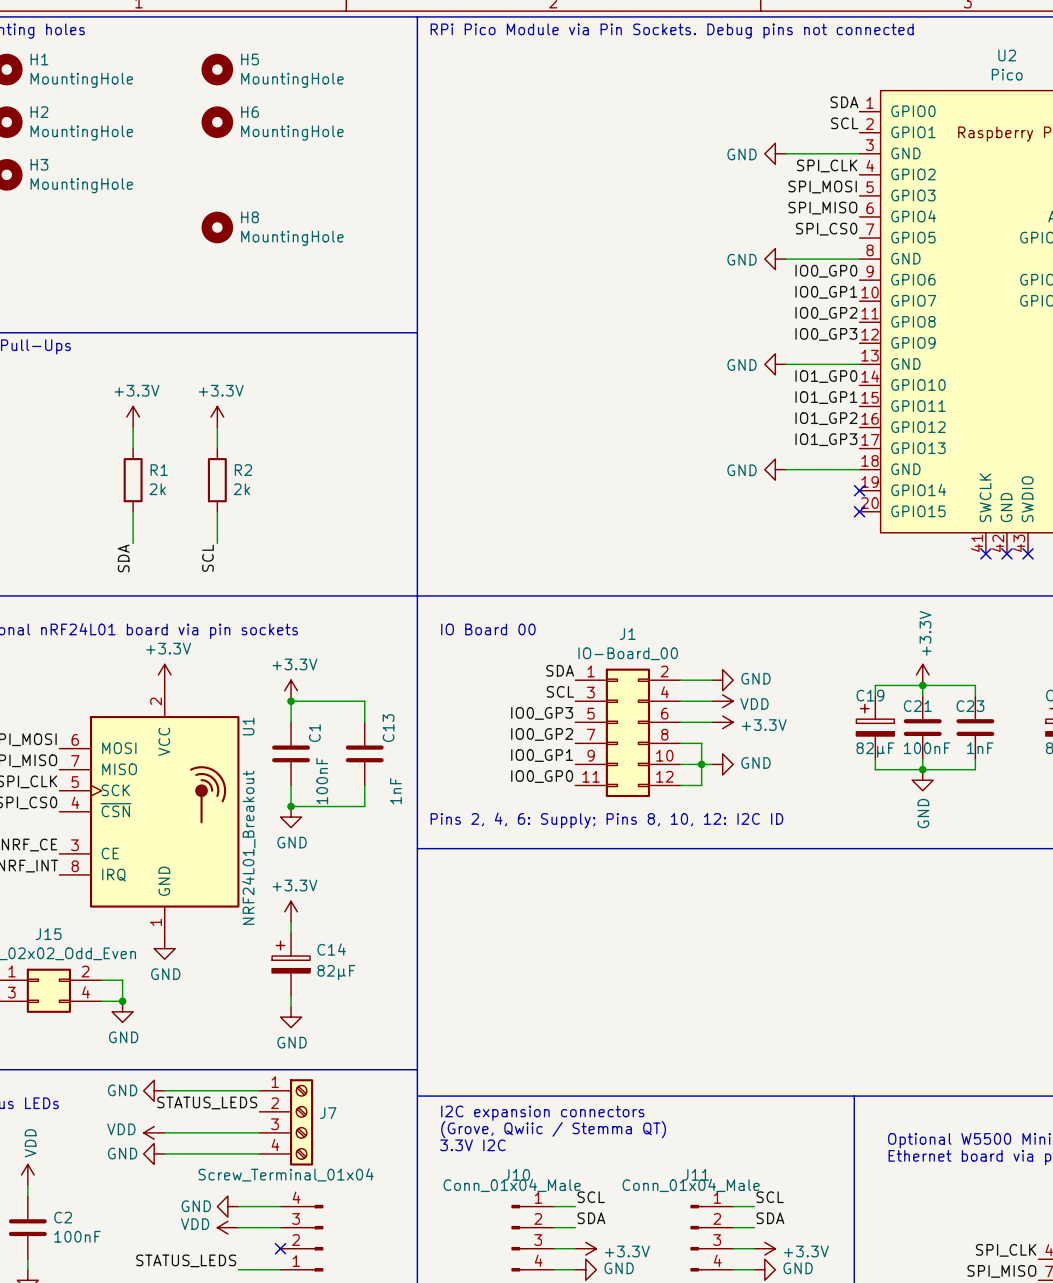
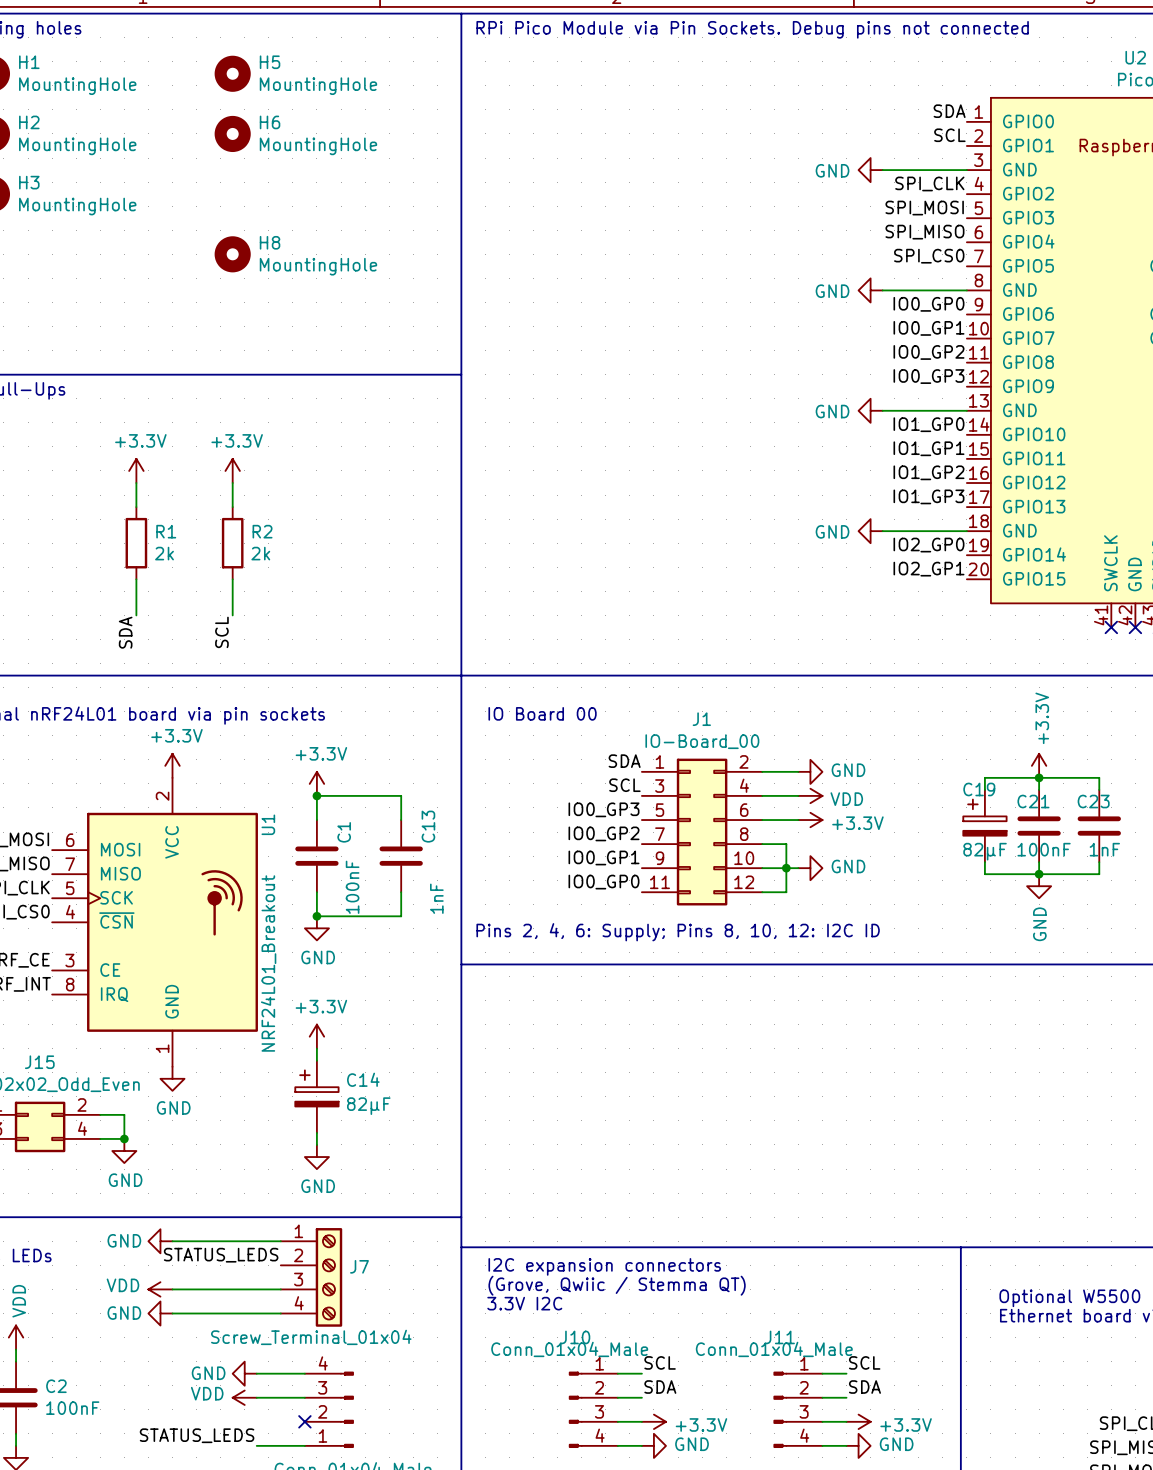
label: none -> IO2_GP0 (928, 545)
no-connect mark: (859, 490) -> none
label: none -> IO2_GP1 (928, 569)
no-connect mark: (859, 511) -> none

